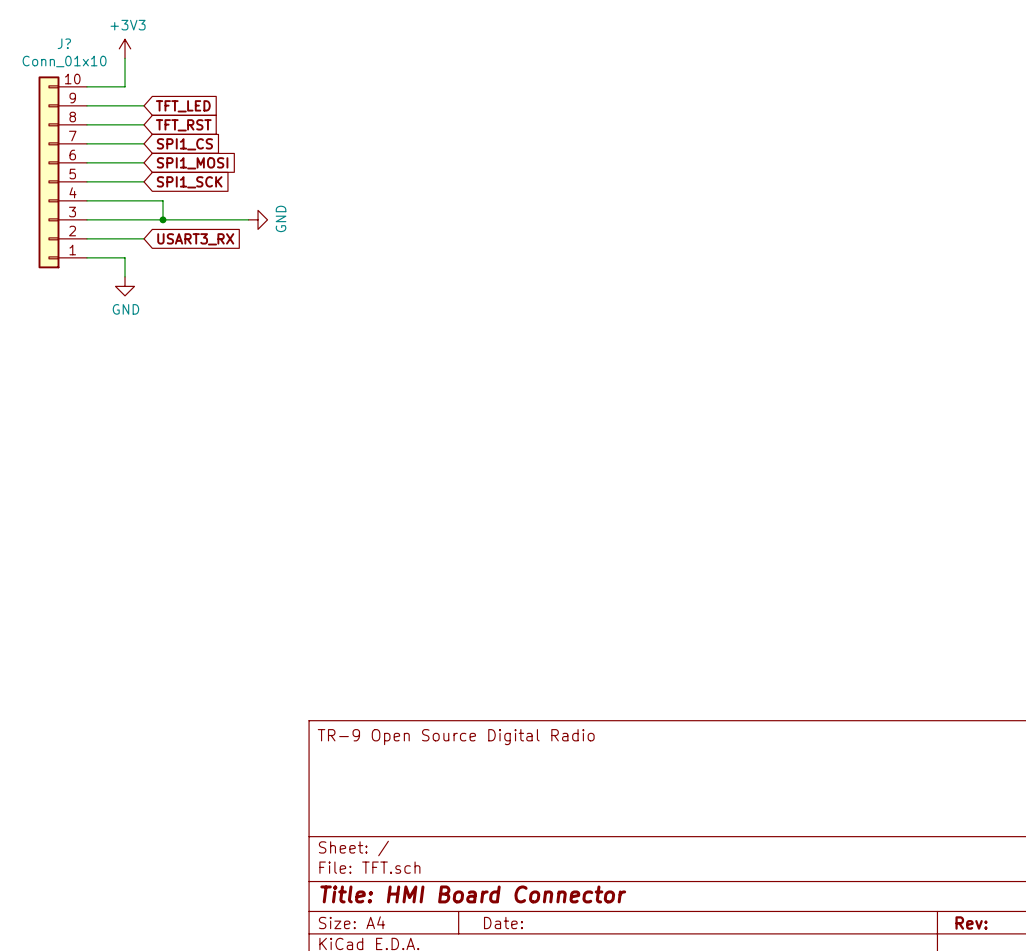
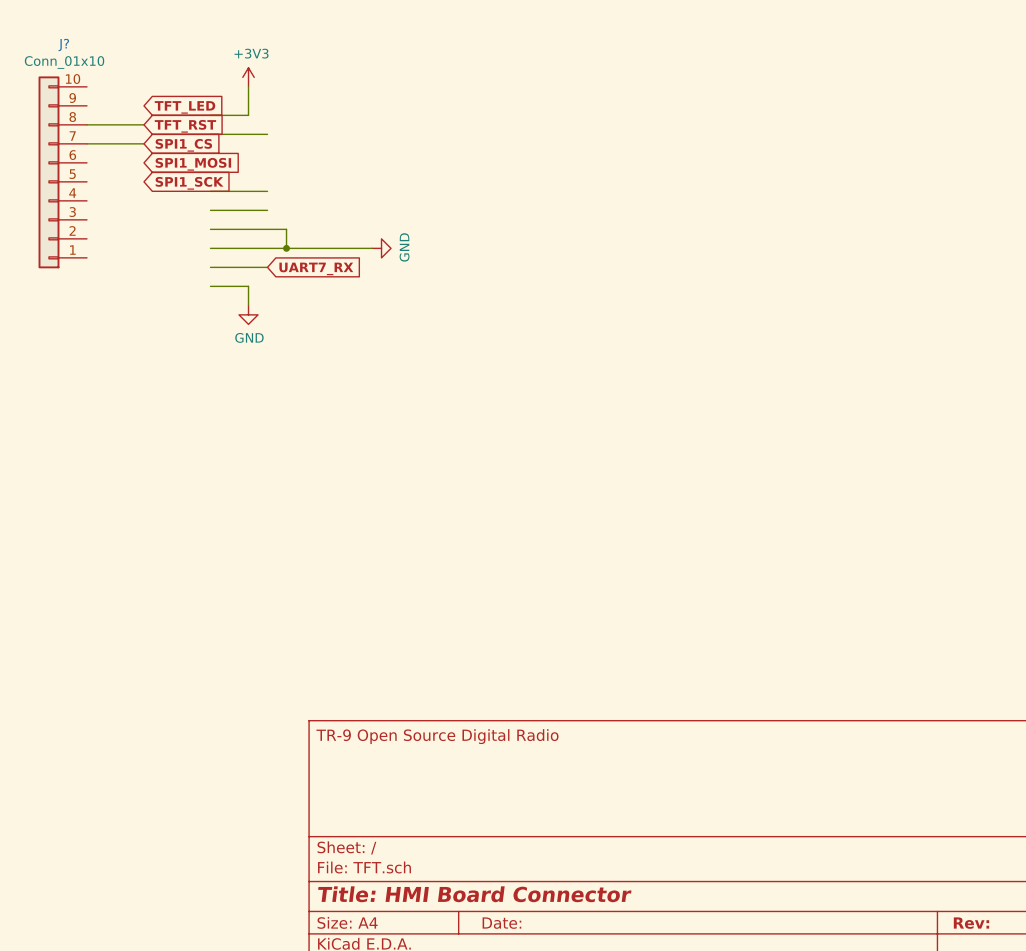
power symbol position: +3V3 (125, 48) -> +3V3 (248, 77)
wire: (125, 58) (125, 86) (87, 86) -> (248, 86) (248, 115) (210, 115)
wire: (87, 105) (144, 105) -> (210, 134) (267, 134)
wire: (87, 162) (144, 162) -> (210, 191) (267, 191)
wire: (87, 181) (144, 181) -> (210, 210) (267, 210)
wire: (87, 200) (163, 200) (163, 219) -> (210, 229) (286, 229) (286, 248)
wire: (87, 219) (248, 219) -> (210, 248) (372, 248)
junction: (163, 219) -> none
power symbol: GND (258, 219) -> none
wire: (87, 238) (144, 238) -> (210, 267) (267, 267)
global label: USART3_RX (195, 239) -> none
junction: none -> (286, 248)
power symbol: none -> GND (381, 248)
wire: (87, 257) (125, 257) (125, 276) -> (210, 286) (248, 286) (248, 305)
global label: none -> UART7_RX (316, 268)
power symbol: GND (125, 286) -> none
power symbol: none -> GND (248, 314)

